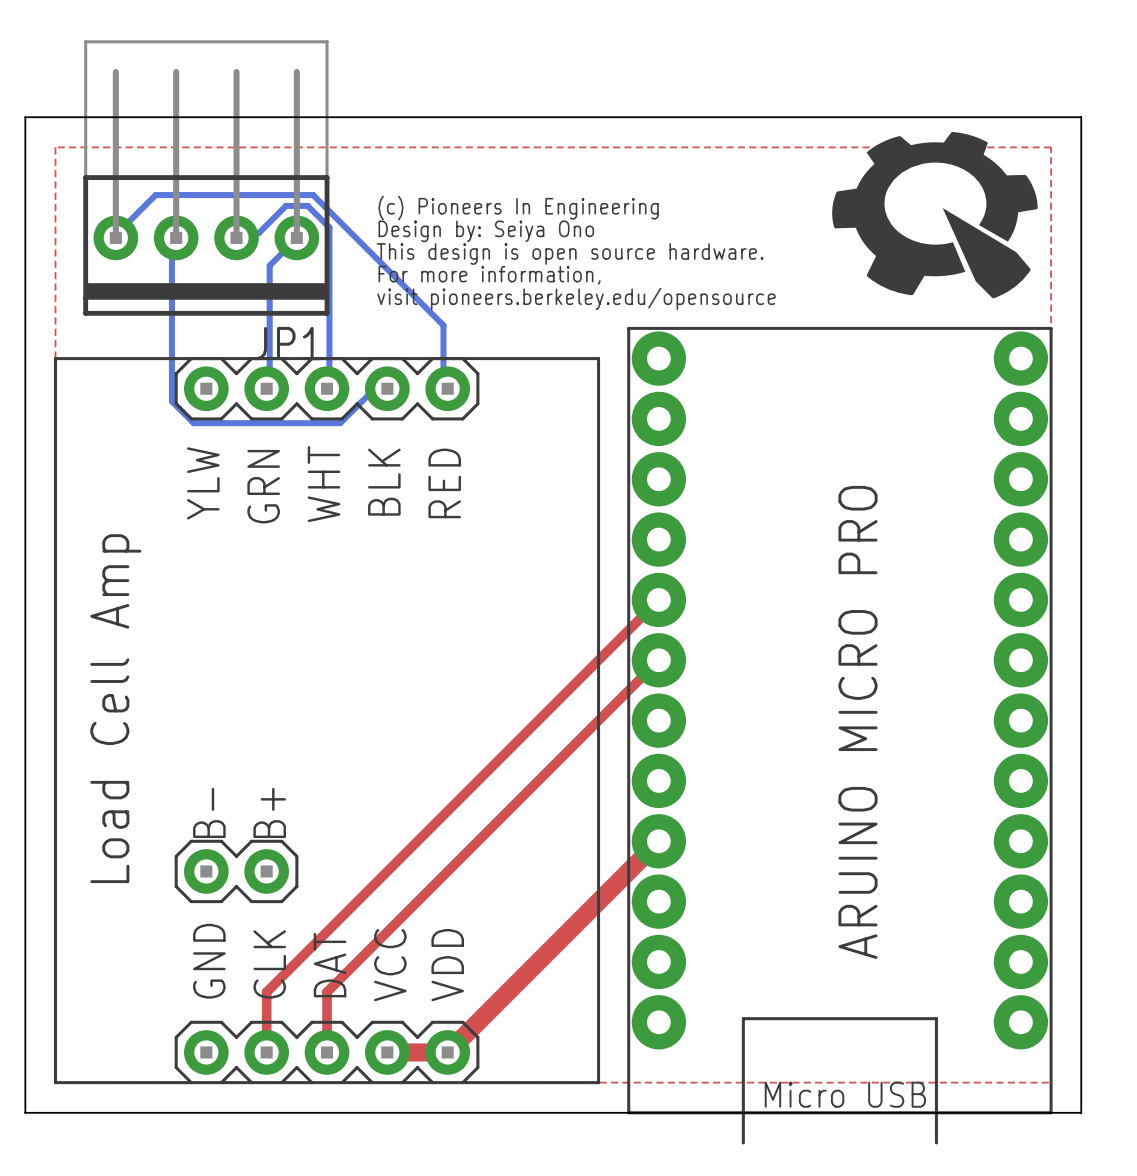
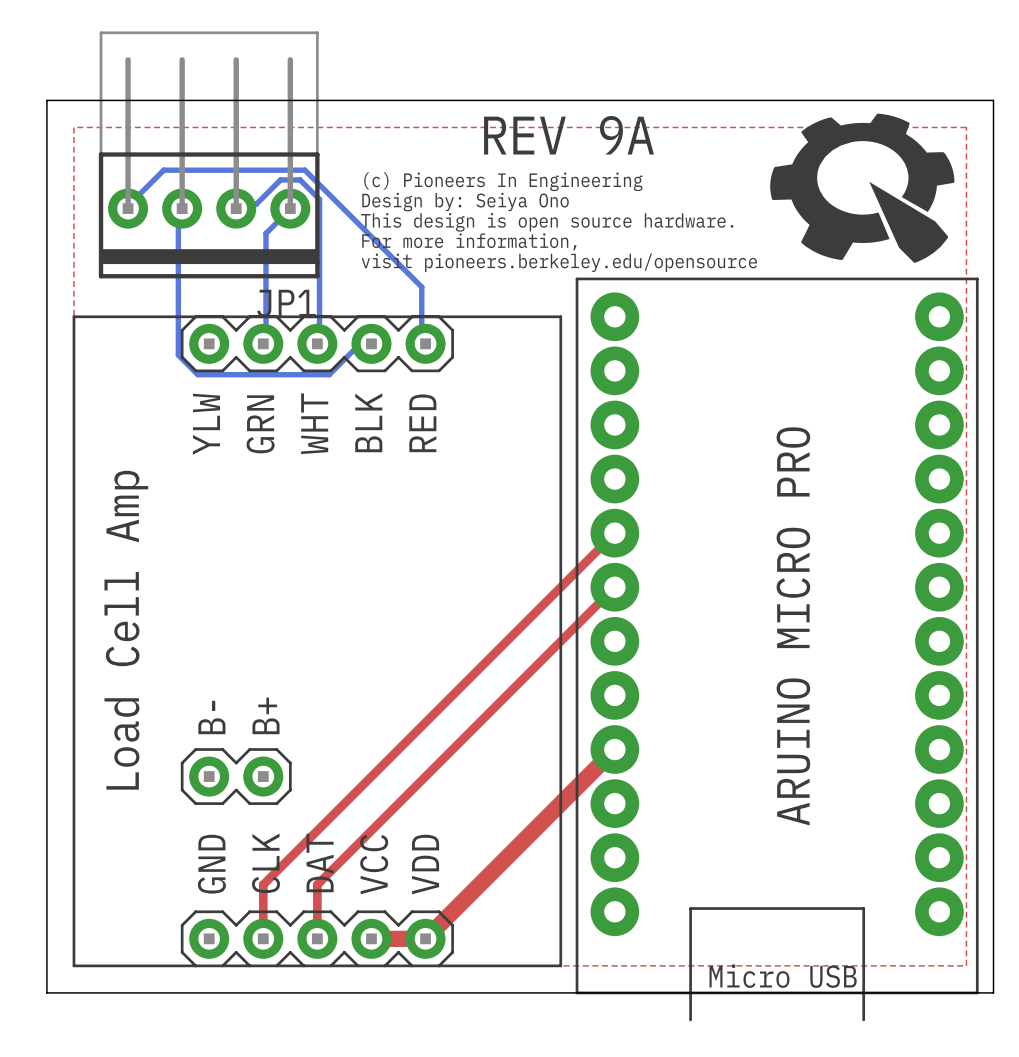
text: none -> REV 9A (568, 135)
part footprint: [627, 326, 1053, 1145] -> [575, 277, 979, 1022]

